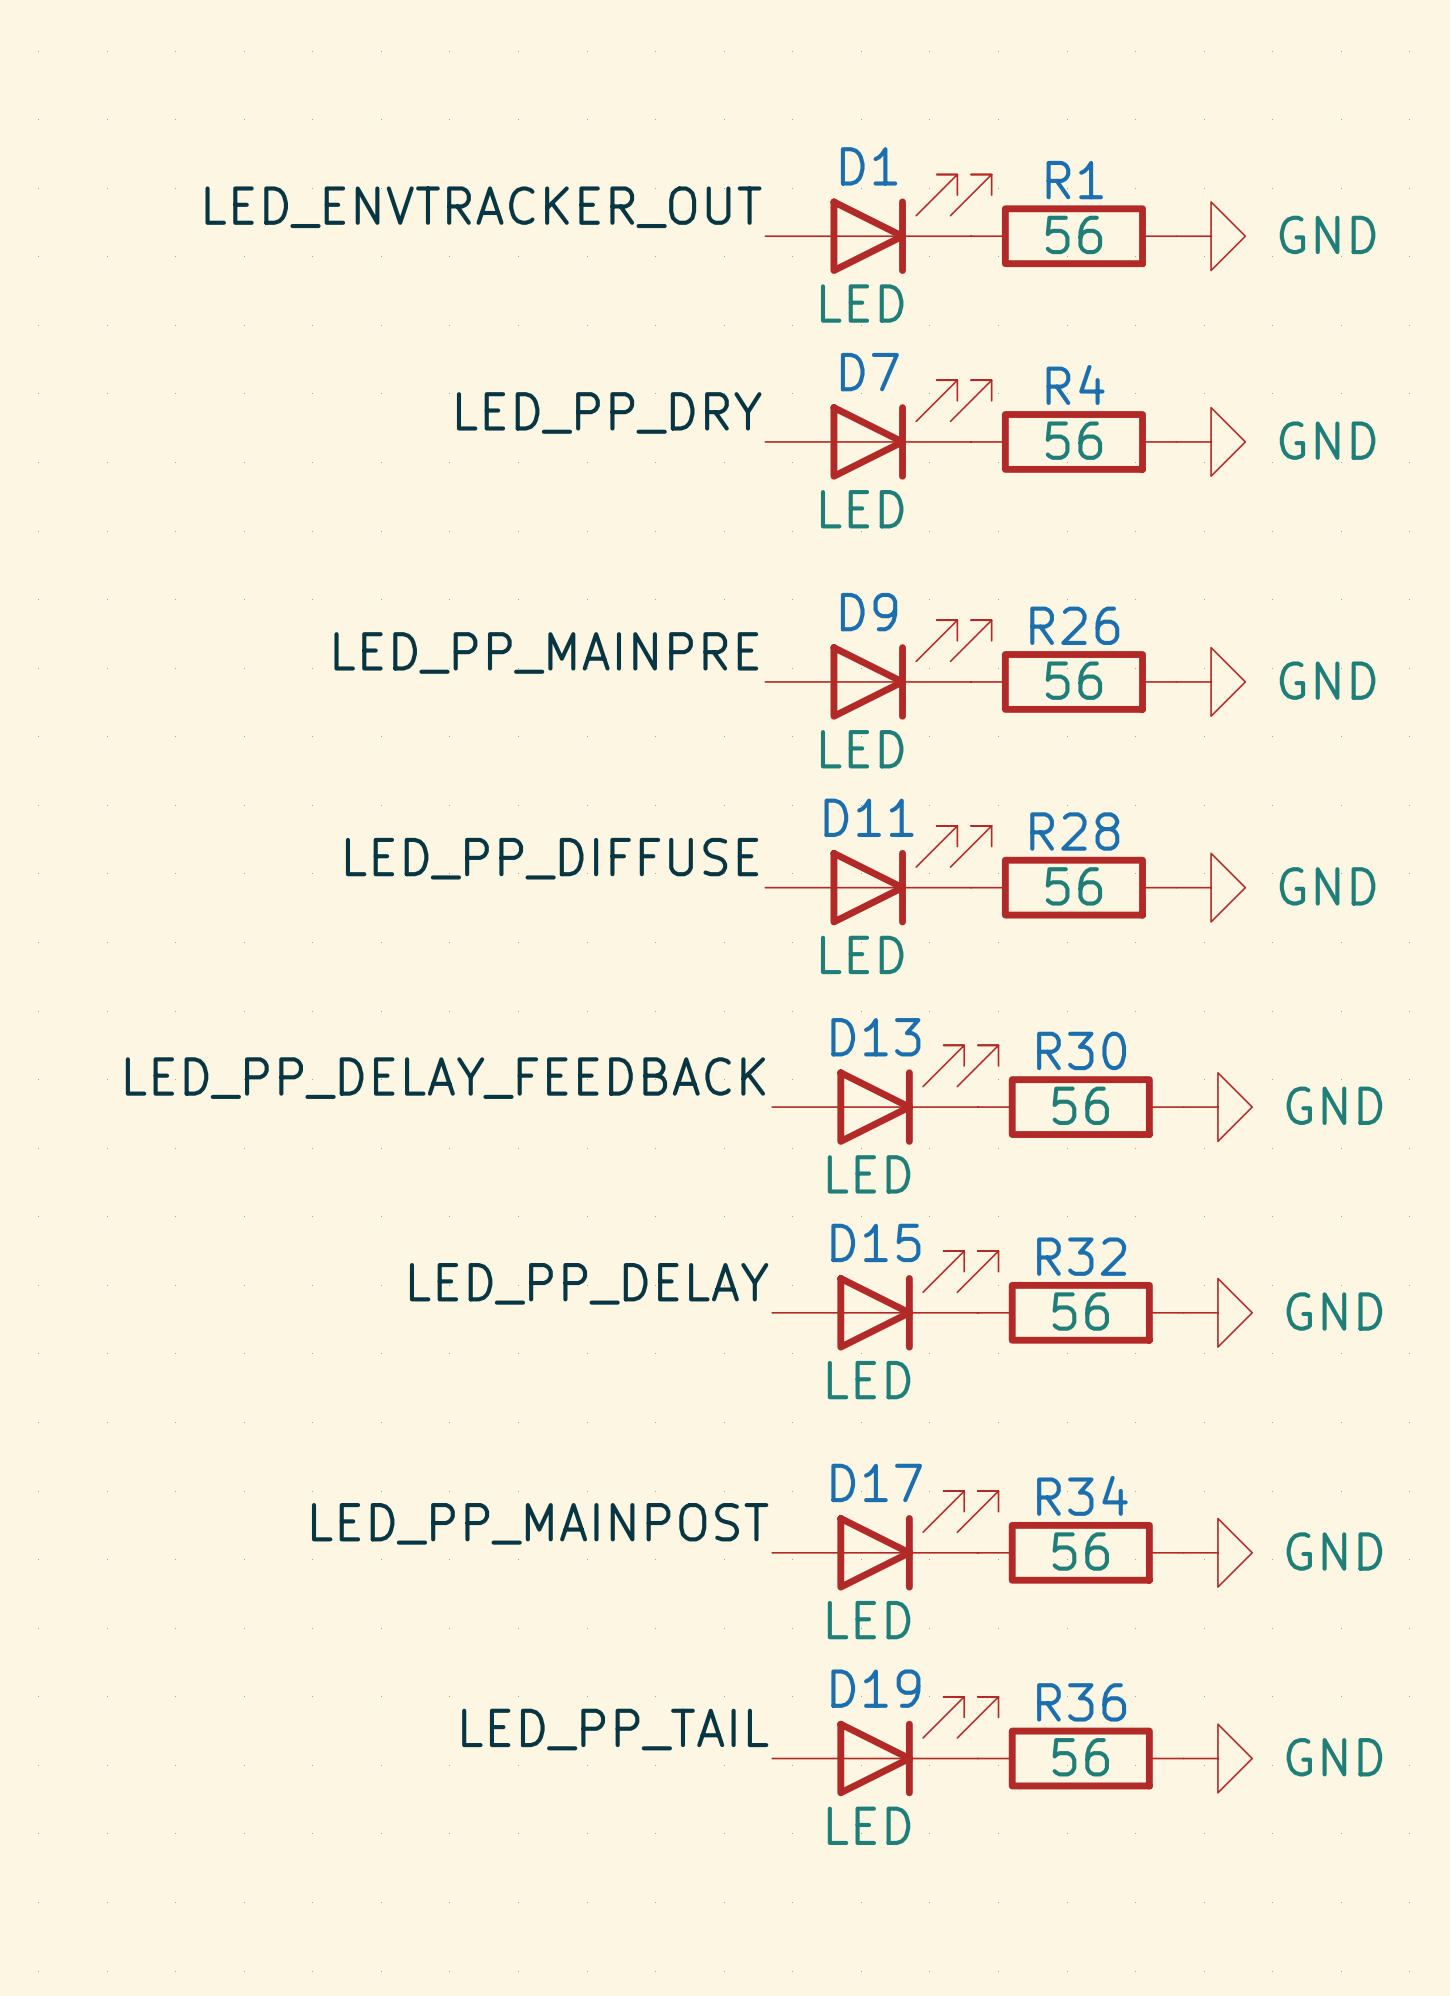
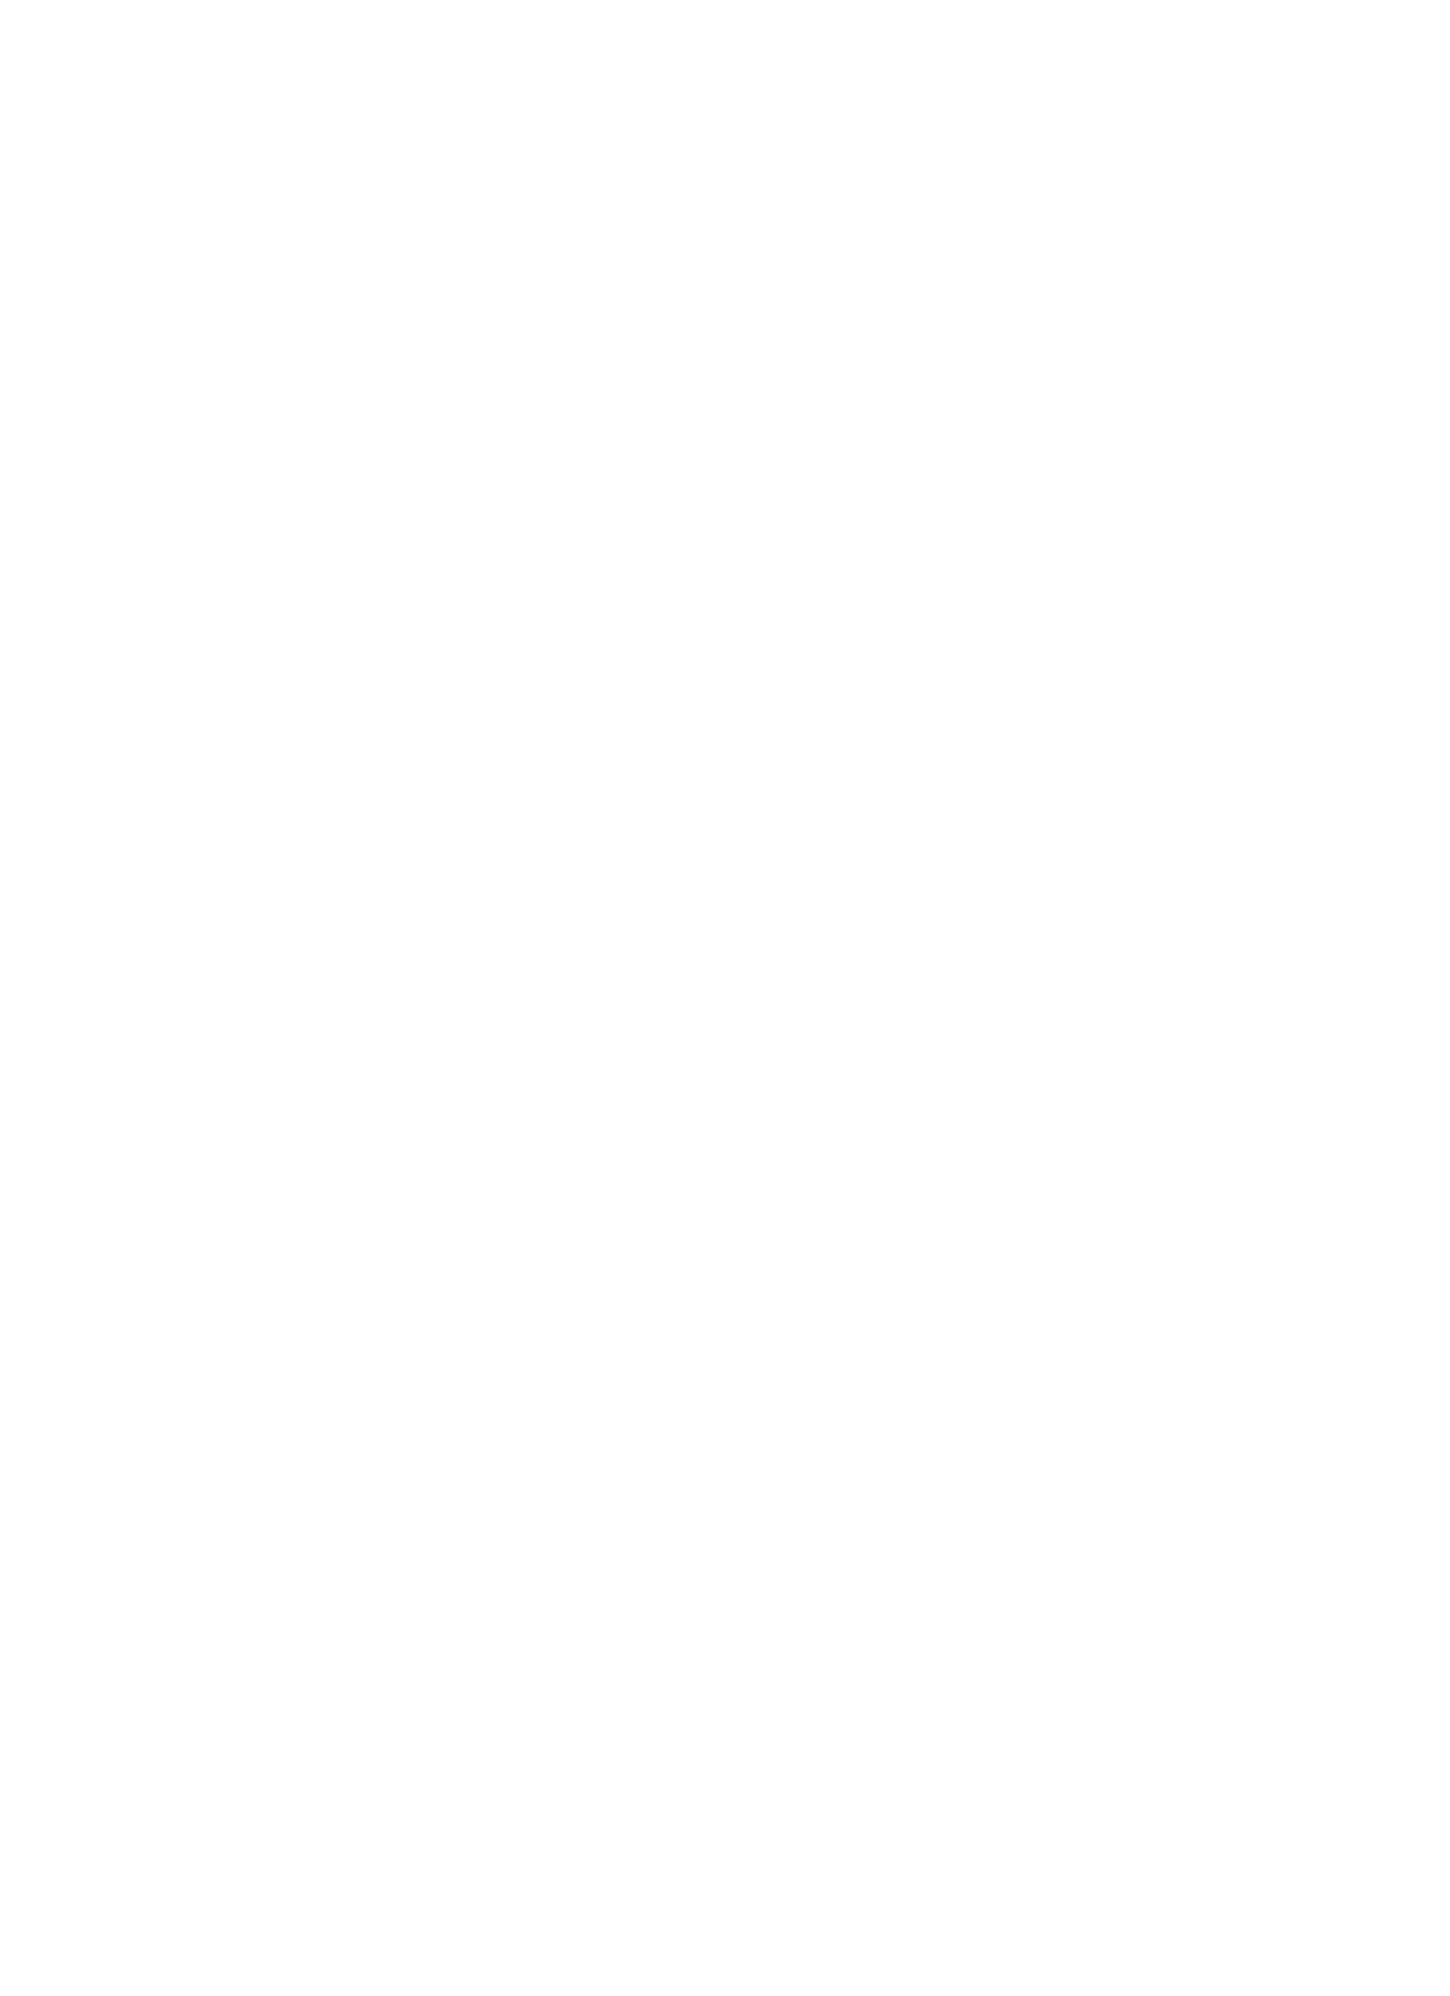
label: LED_ENVTRACKER_OUT (483, 207) -> none
D1: LED (878, 224) -> none
R1: 56 (1073, 236) -> none
power symbol: GND (1211, 236) -> none
label: LED_PP_DRY (609, 412) -> none
D7: LED (878, 429) -> none
R4: 56 (1073, 441) -> none
power symbol: GND (1211, 441) -> none
label: LED_PP_MAINPRE (546, 652) -> none
D9: LED (878, 669) -> none
R26: 56 (1073, 681) -> none
power symbol: GND (1211, 681) -> none
label: LED_PP_DIFFUSE (552, 858) -> none
D11: LED (878, 875) -> none
R28: 56 (1073, 887) -> none
power symbol: GND (1211, 887) -> none
label: LED_PP_DELAY_FEEDBACK (445, 1078) -> none
D13: LED (885, 1095) -> none
R30: 56 (1080, 1107) -> none
power symbol: GND (1217, 1107) -> none
label: LED_PP_DELAY (589, 1283) -> none
D15: LED (885, 1300) -> none
R32: 56 (1080, 1312) -> none
power symbol: GND (1217, 1312) -> none
label: LED_PP_MAINPOST (540, 1523) -> none
D17: LED (885, 1540) -> none
R34: 56 (1080, 1552) -> none
power symbol: GND (1217, 1552) -> none
label: LED_PP_TAIL (615, 1729) -> none
D19: LED (885, 1746) -> none
R36: 56 (1080, 1758) -> none
power symbol: GND (1217, 1758) -> none

